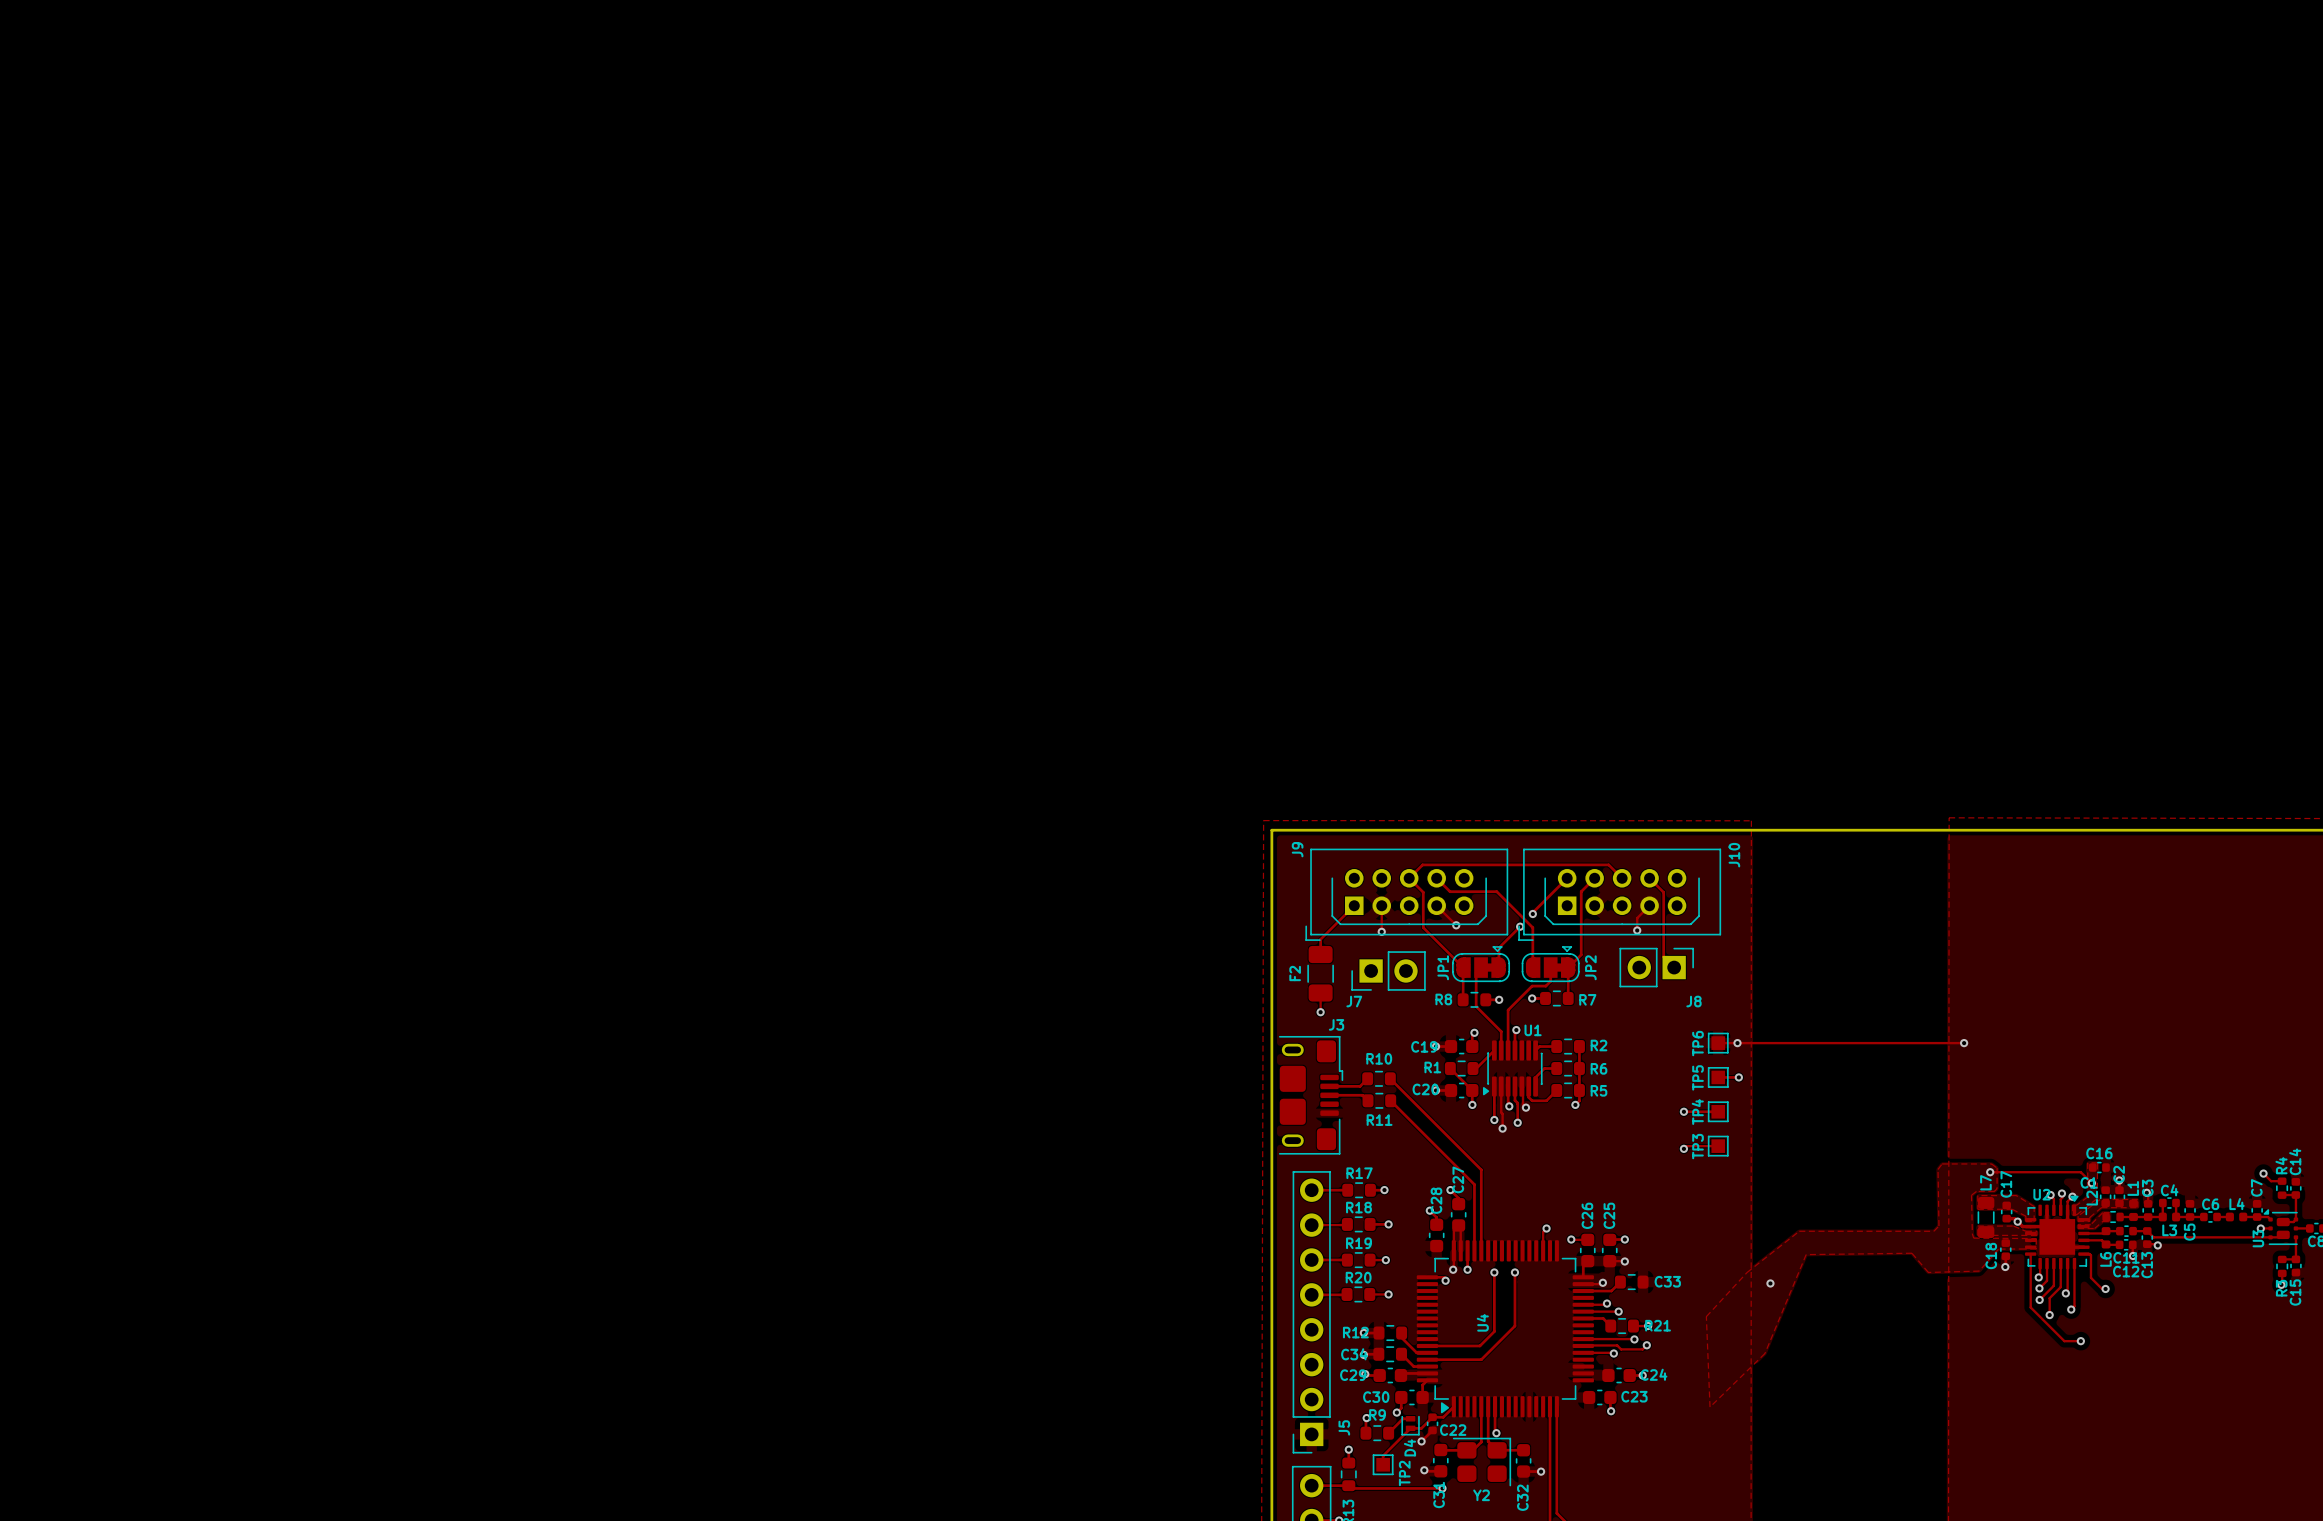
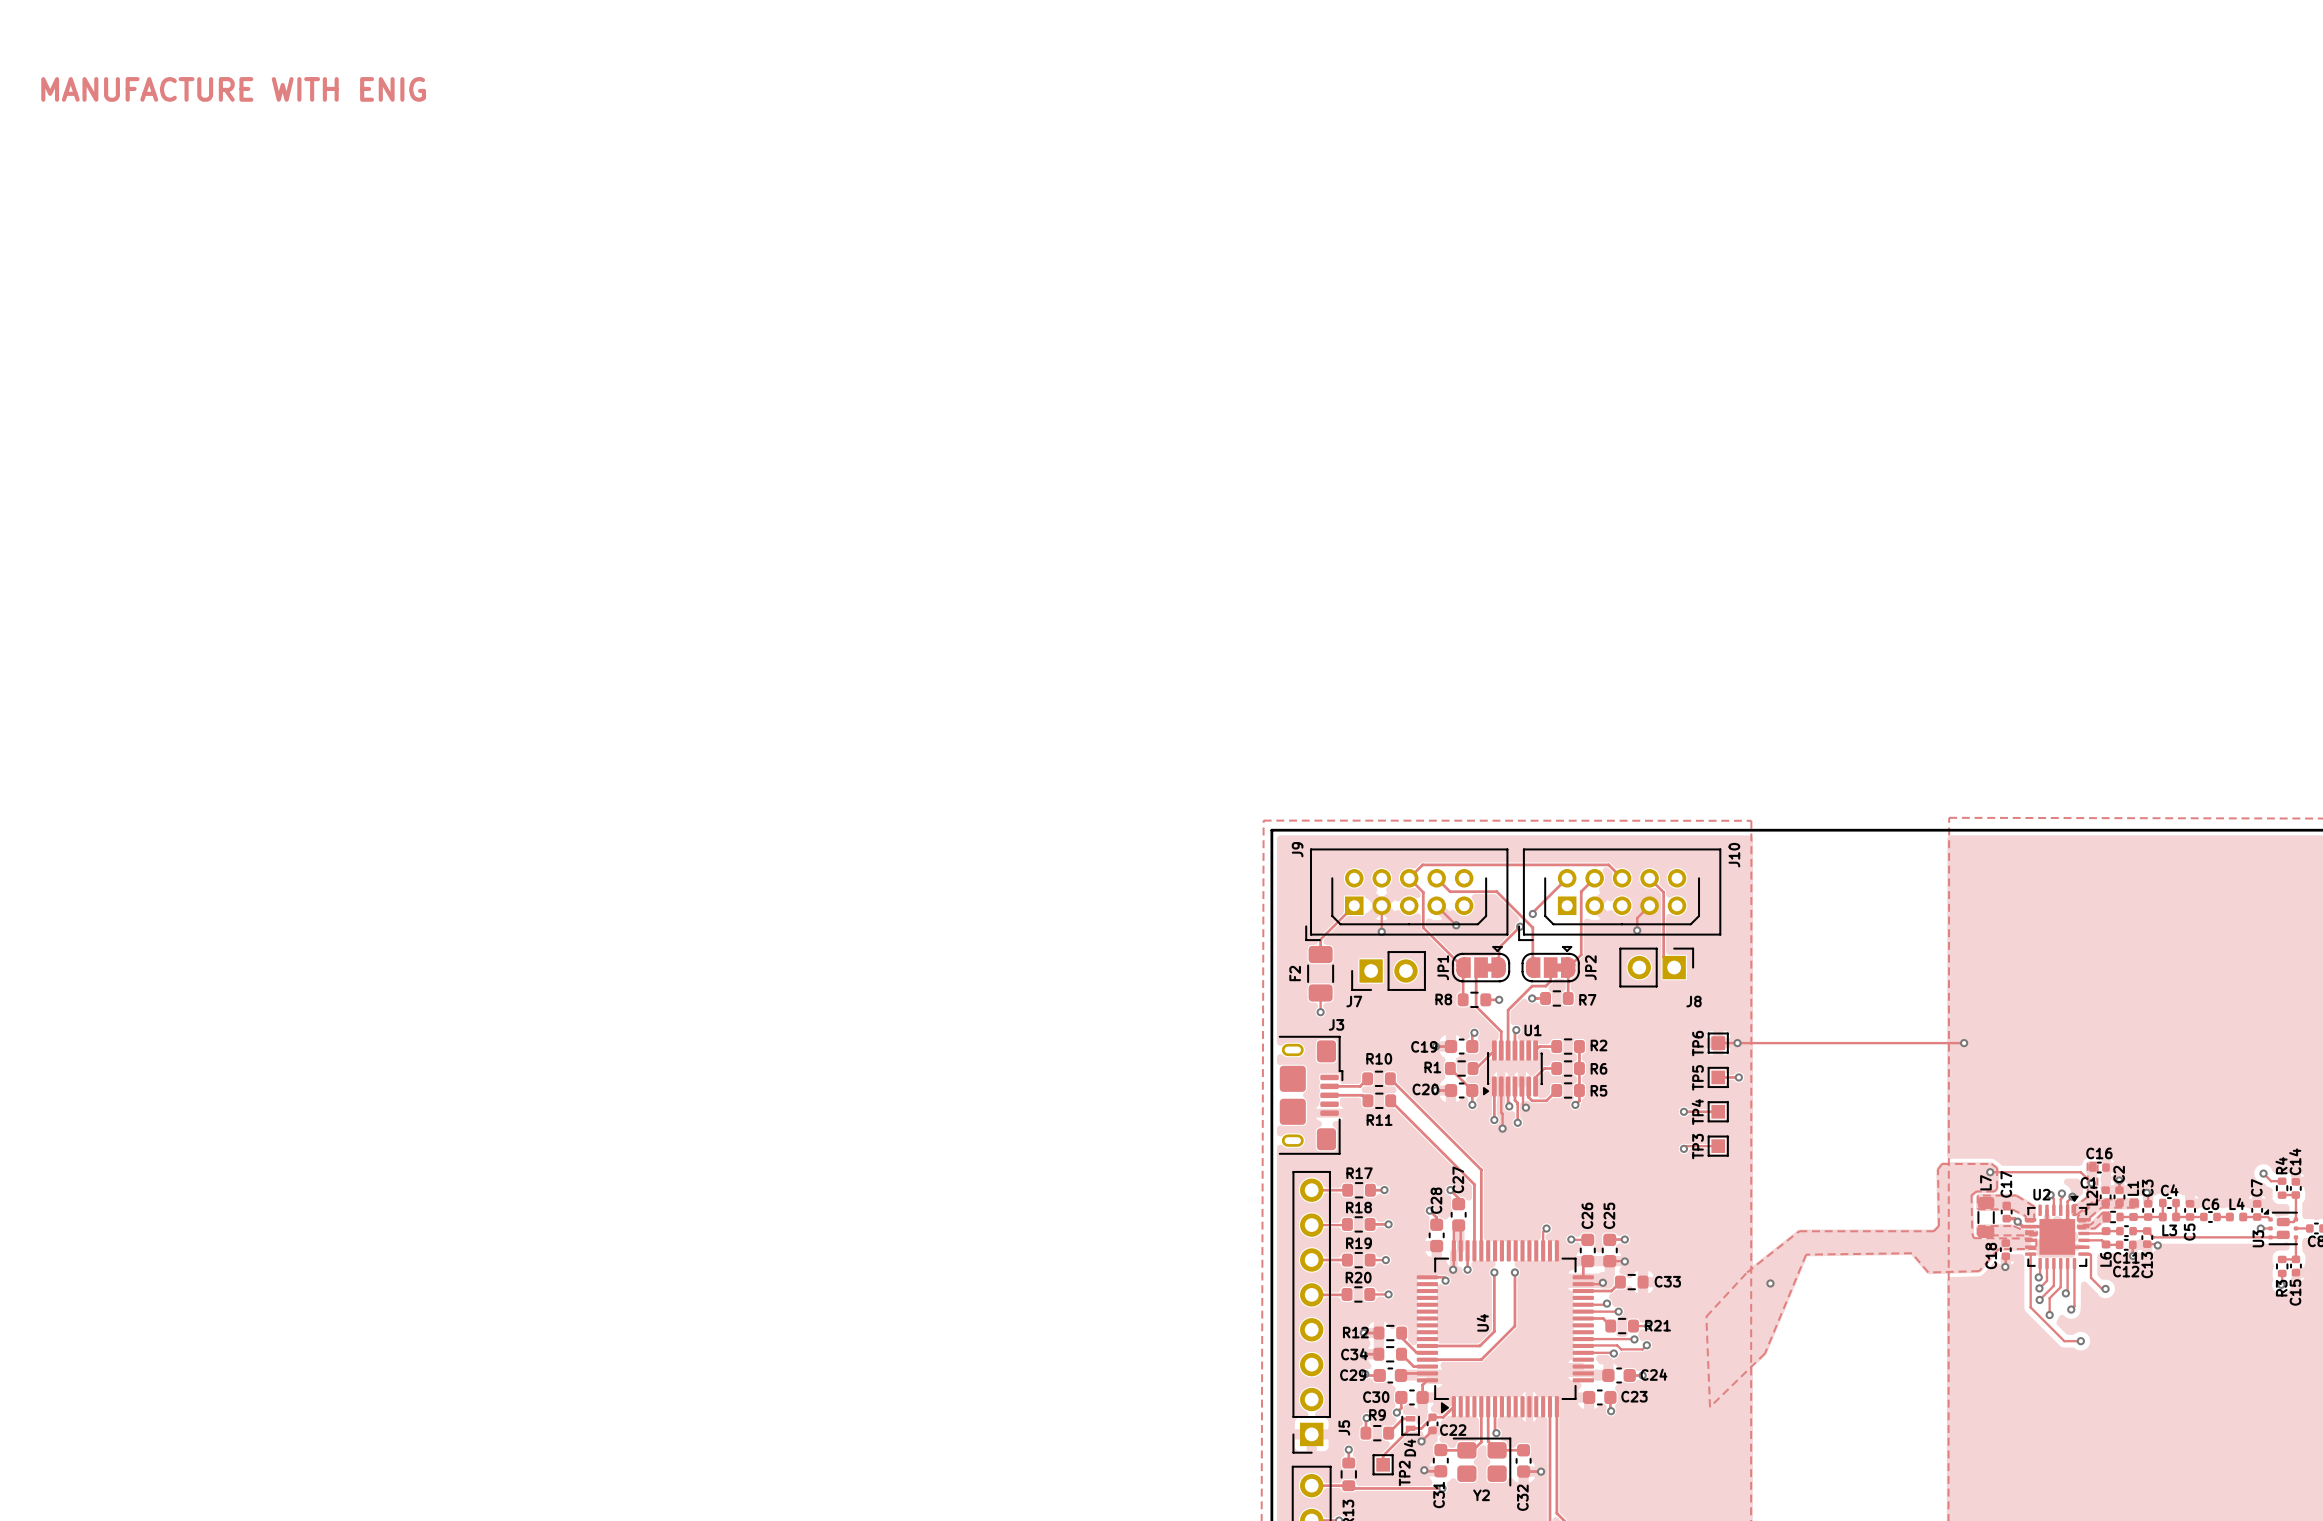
text: none -> MANUFACTURE WITH ENIG (233, 89)

